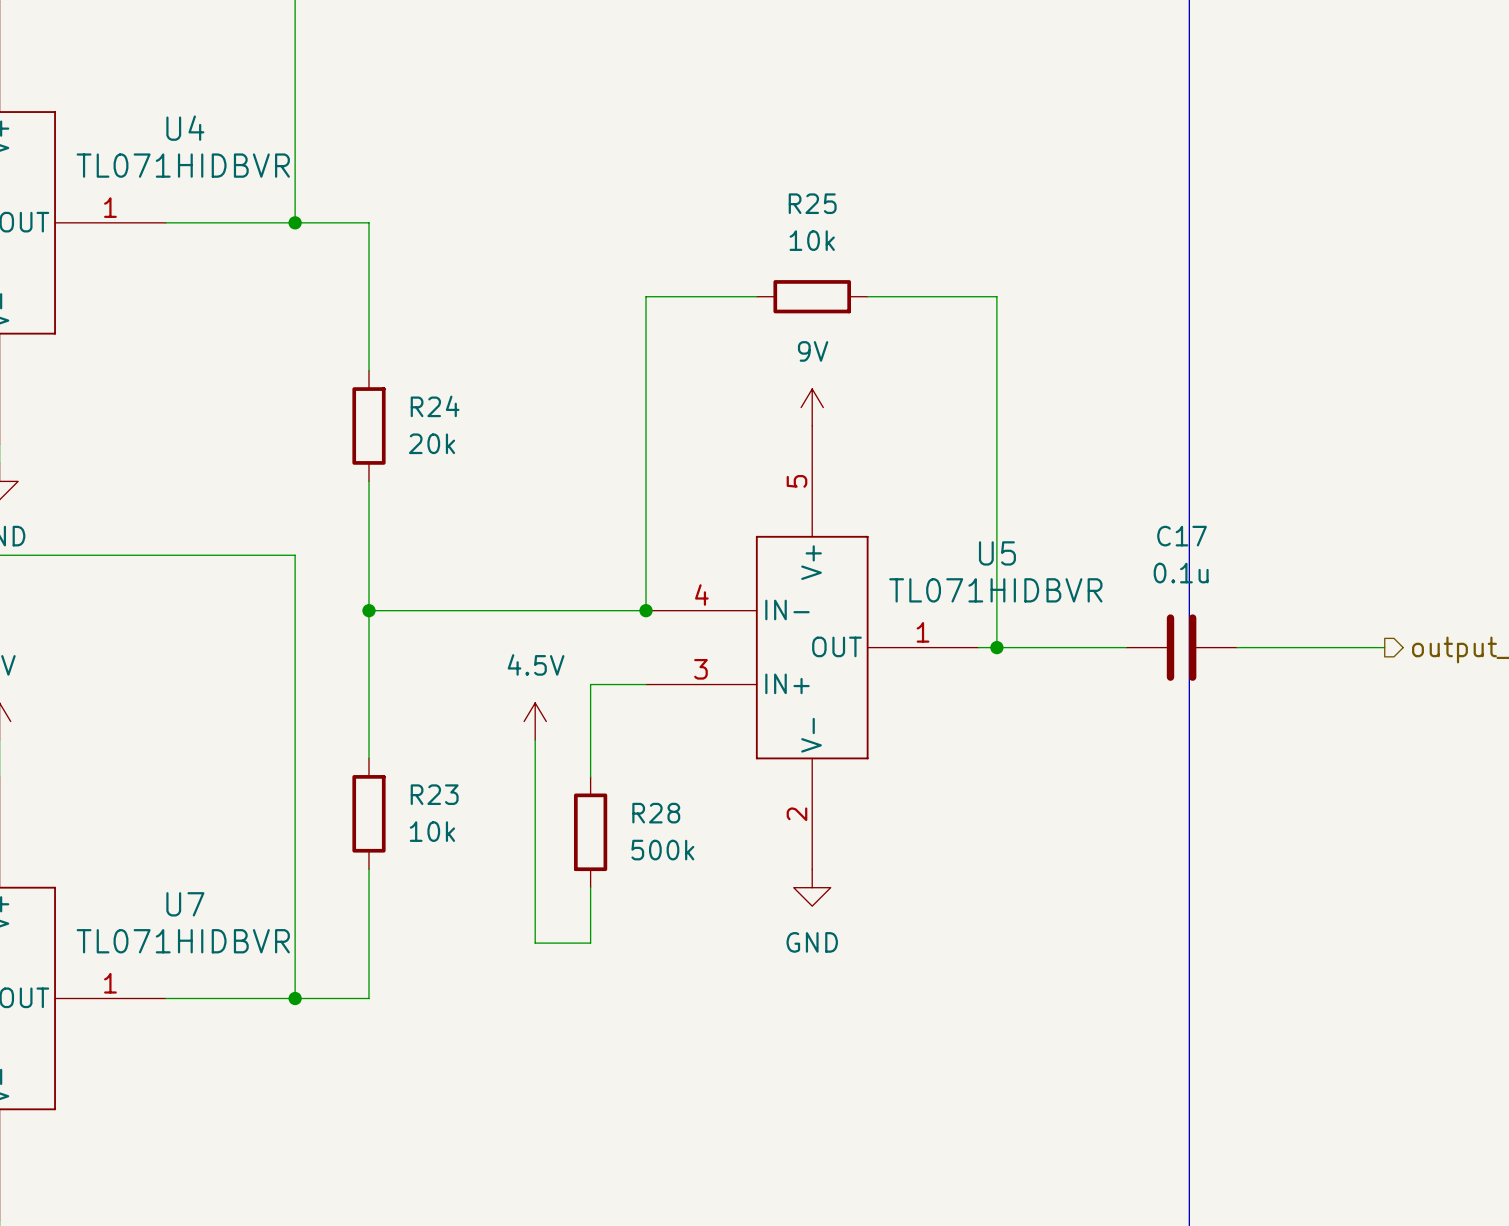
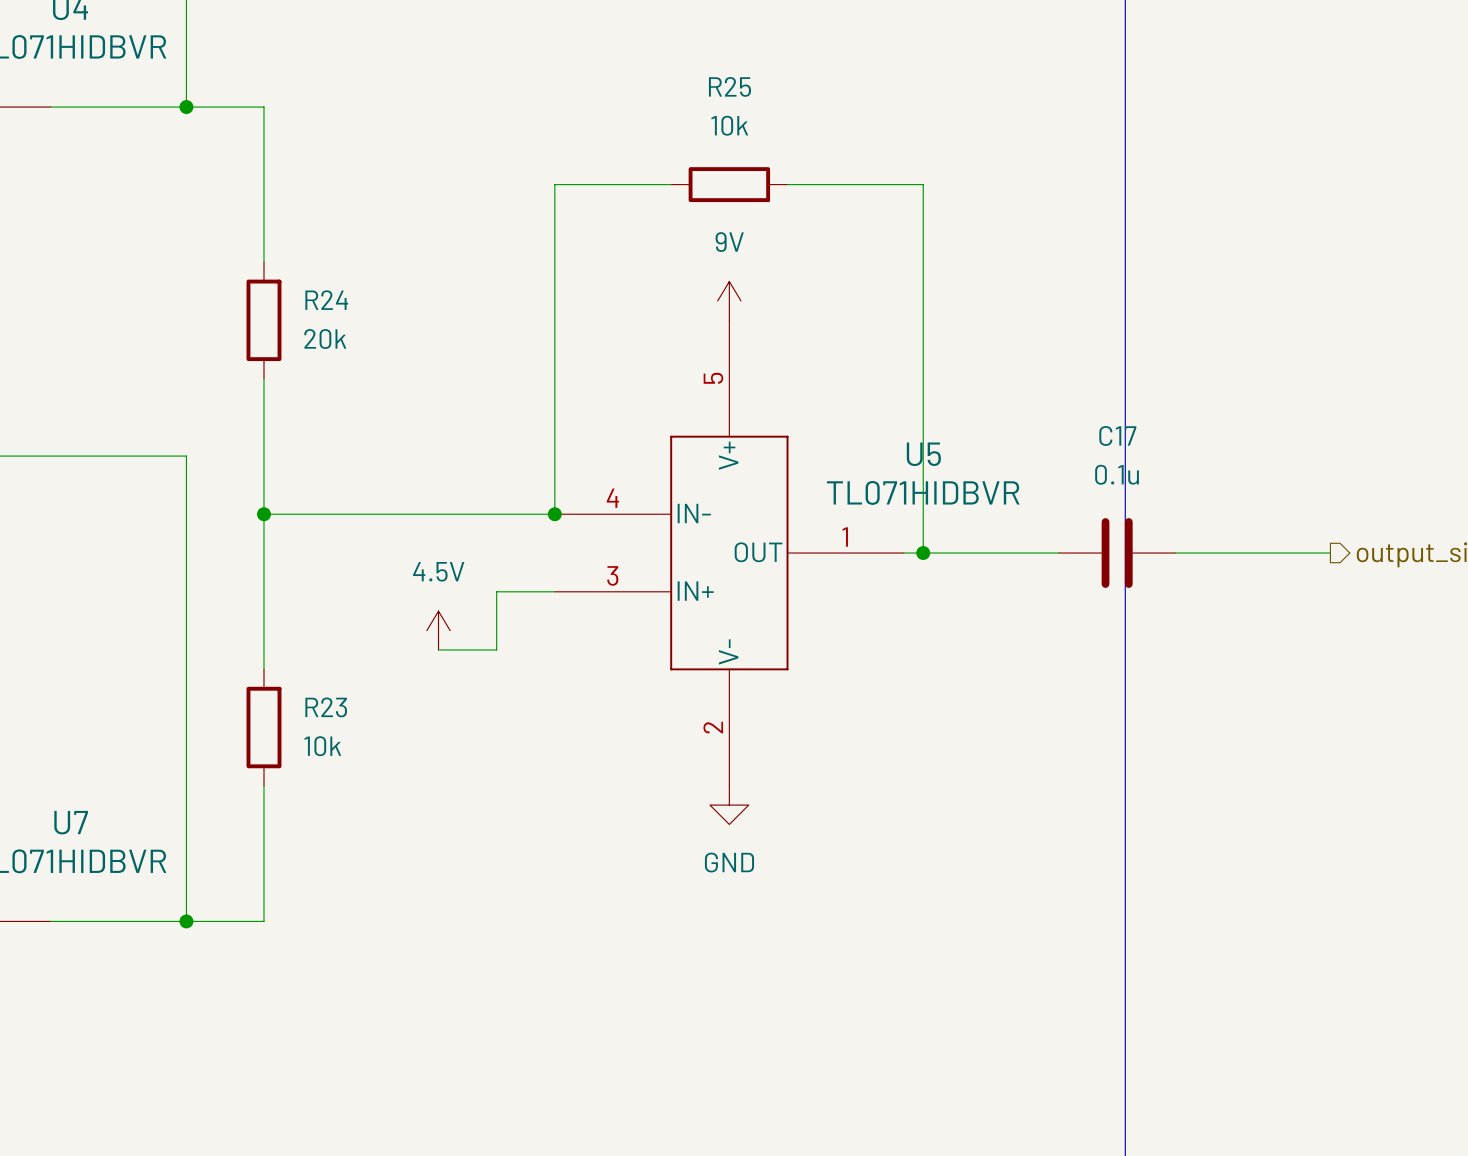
wire: (535, 739) (535, 943) (590, 943) (590, 887) -> none
wire: (590, 739) (590, 776) -> (496, 649) (438, 649)
R28: 500k (590, 832) -> none

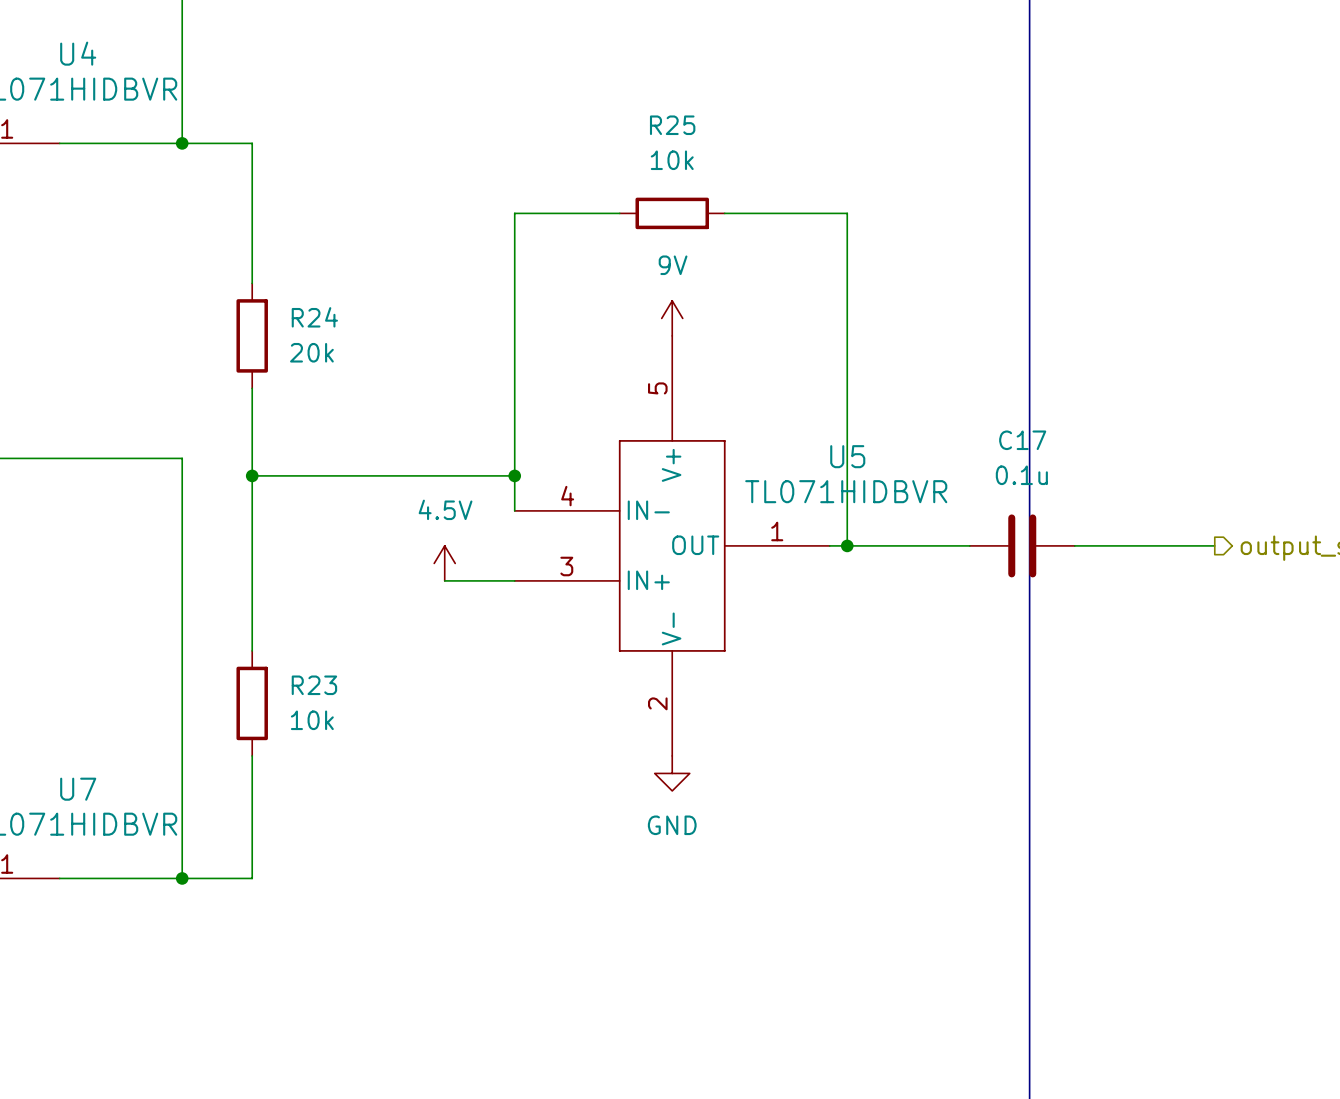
wire: (263, 514) (554, 514) -> (252, 475) (514, 475)
junction position: (263, 514) -> (252, 475)
junction position: (554, 514) -> (514, 475)
wire: (496, 591) (496, 649) (438, 649) -> (462, 580) (444, 580)
power symbol position: 4.5V (438, 630) -> 4.5V (444, 563)

